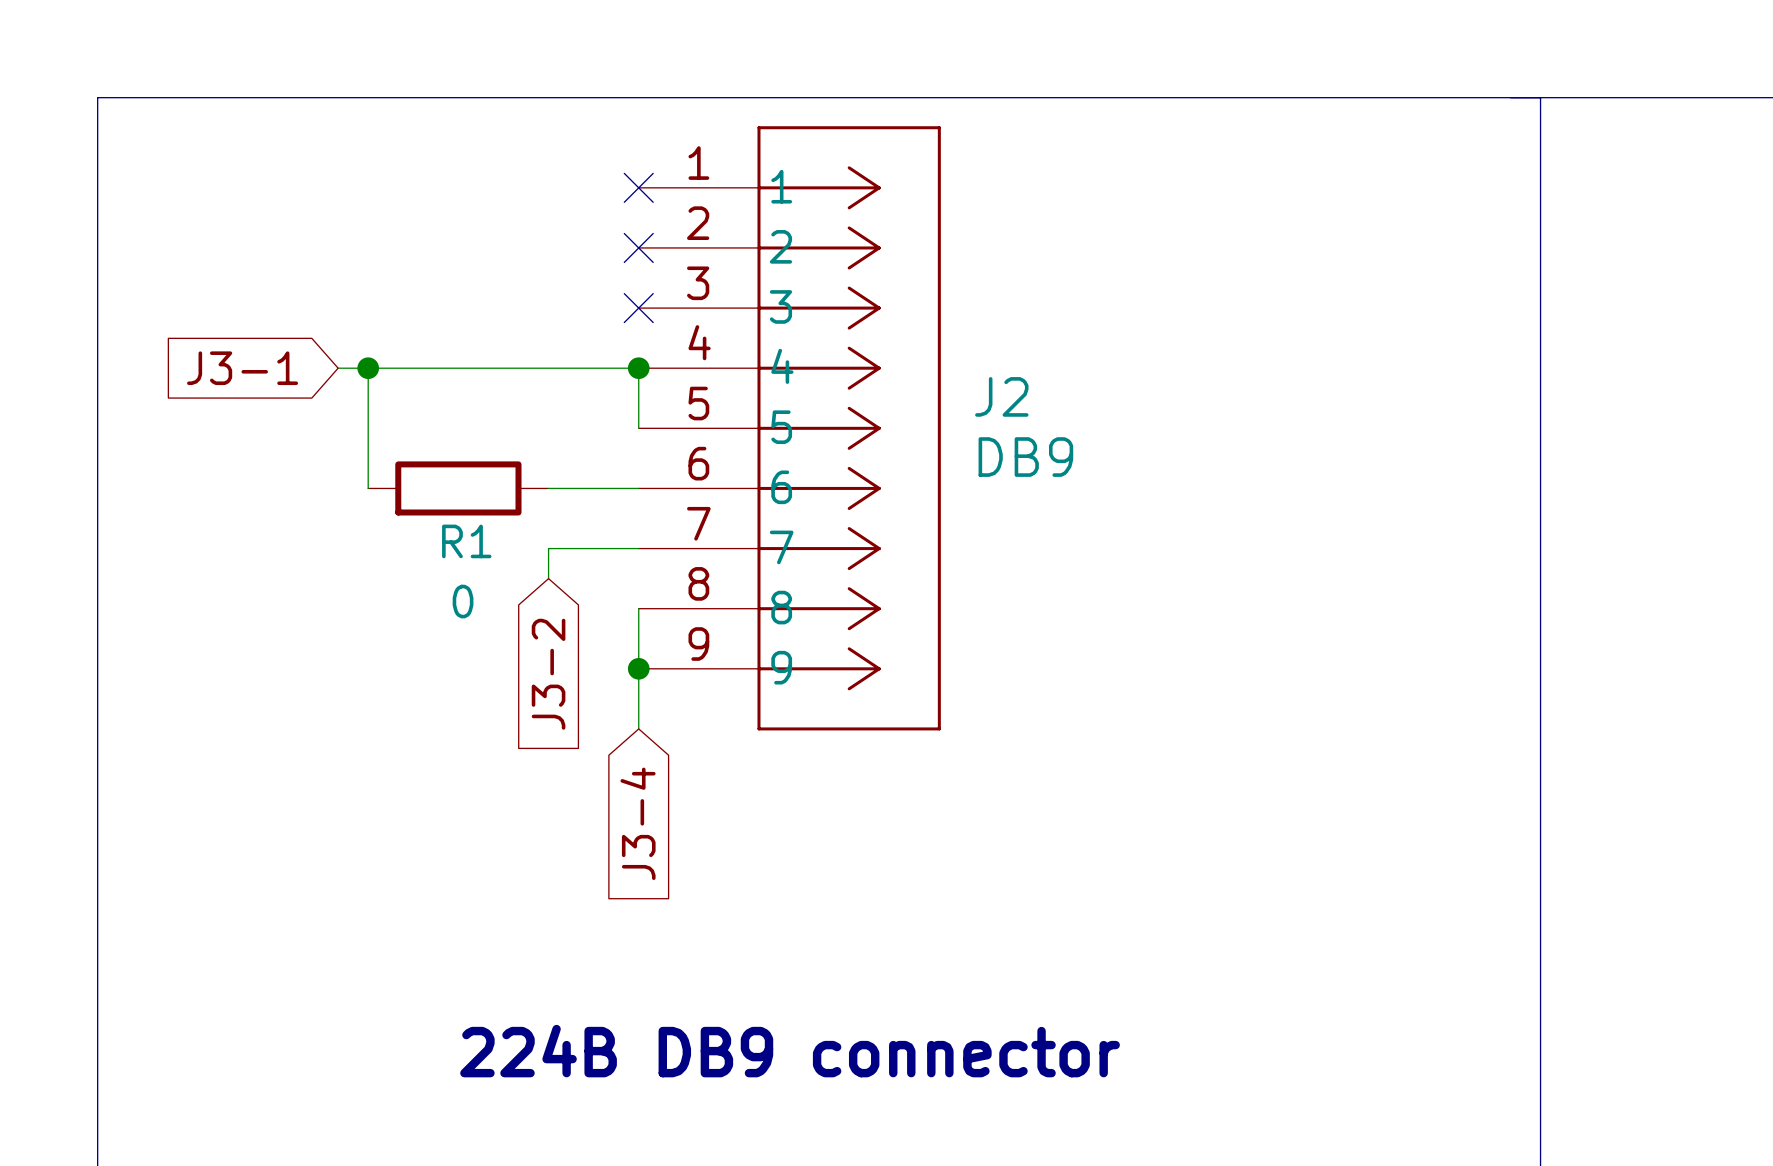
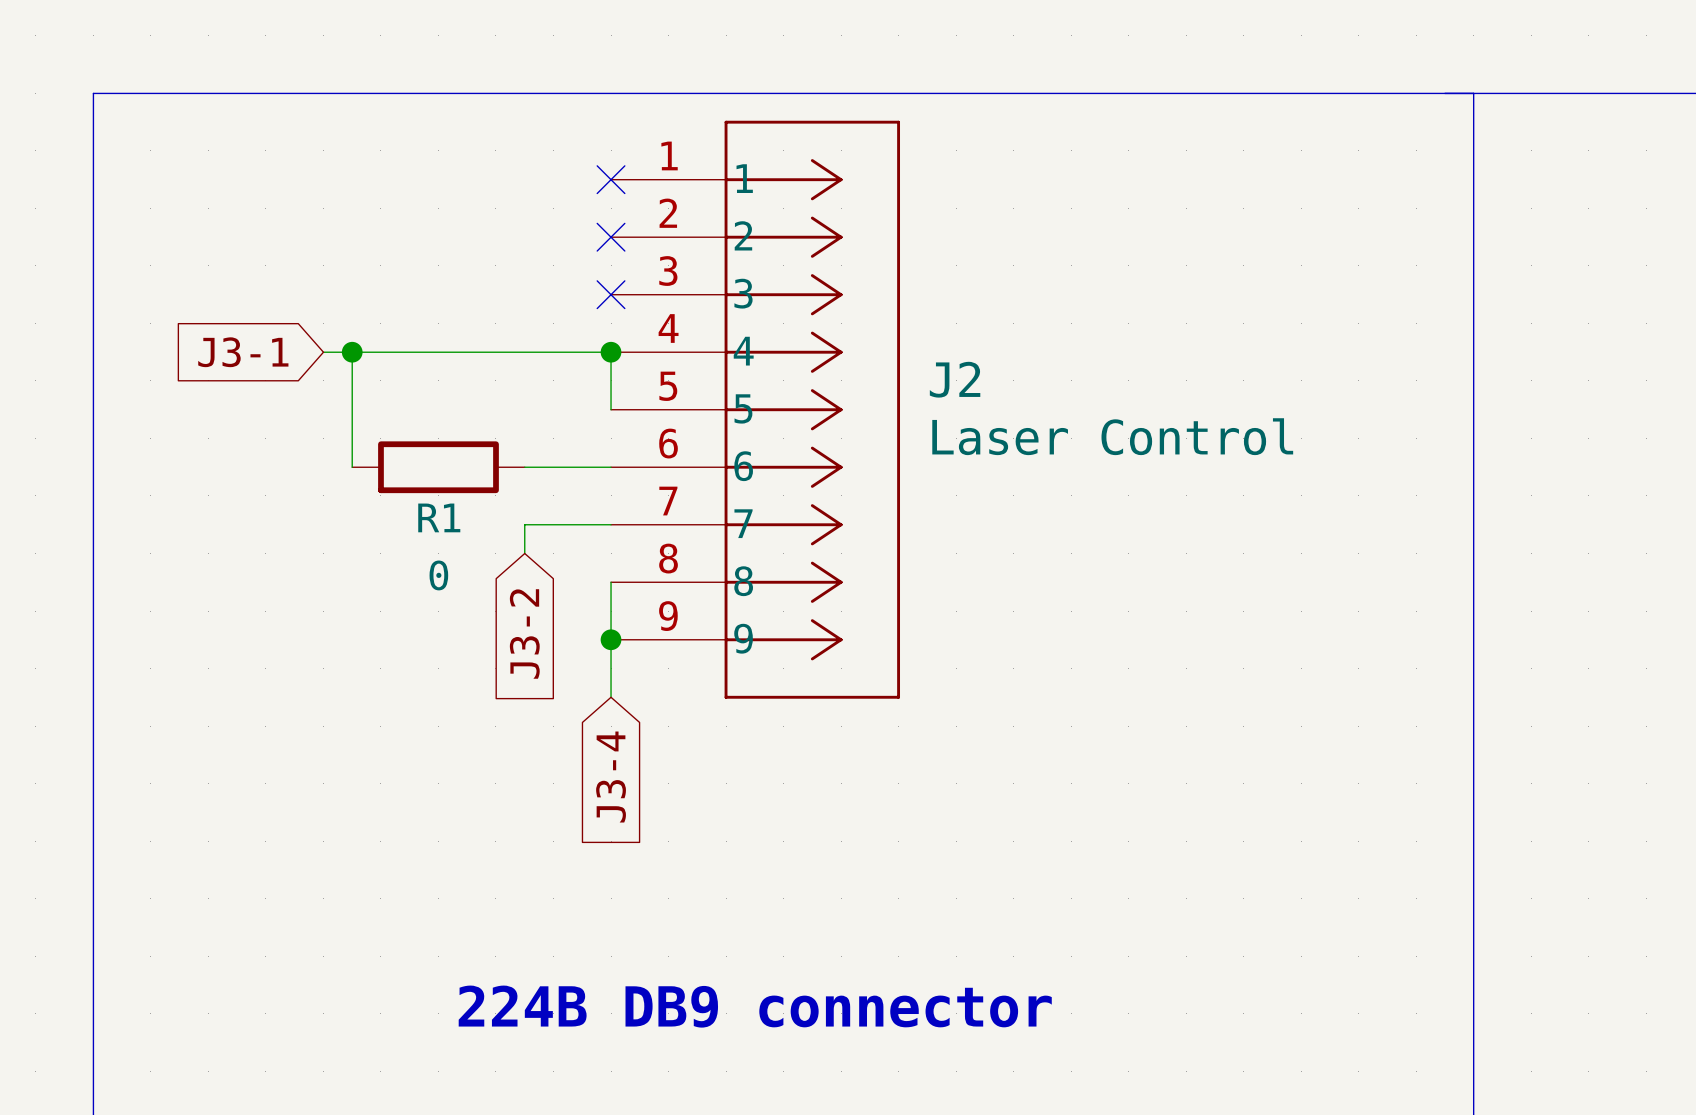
J2 value: DB9 (1025, 457) -> Laser Control (1112, 436)

